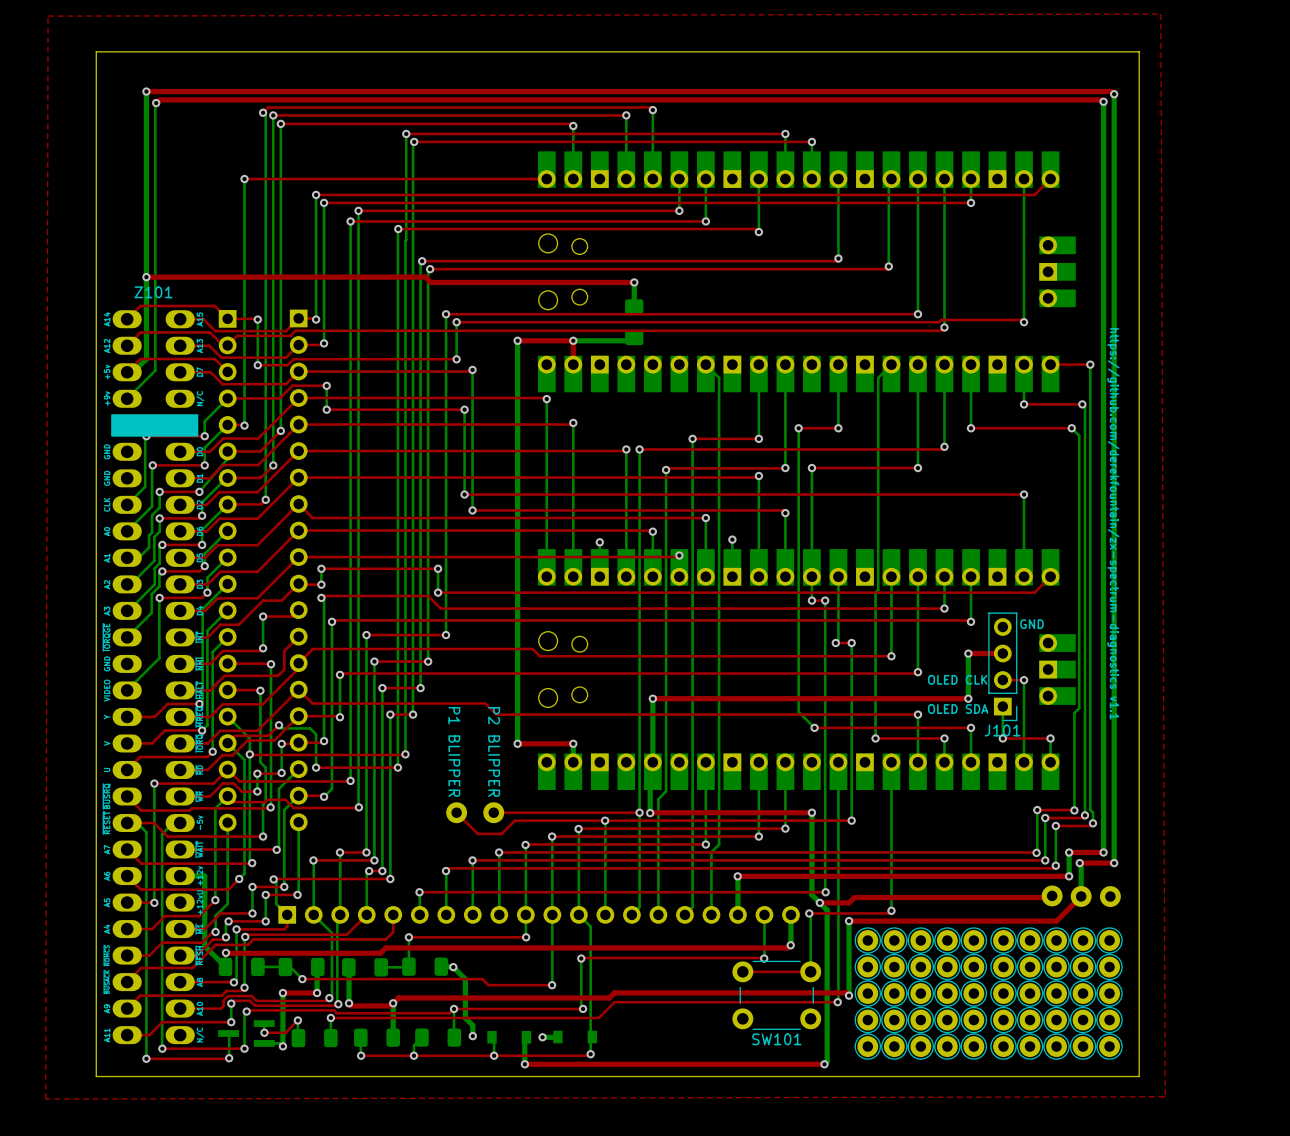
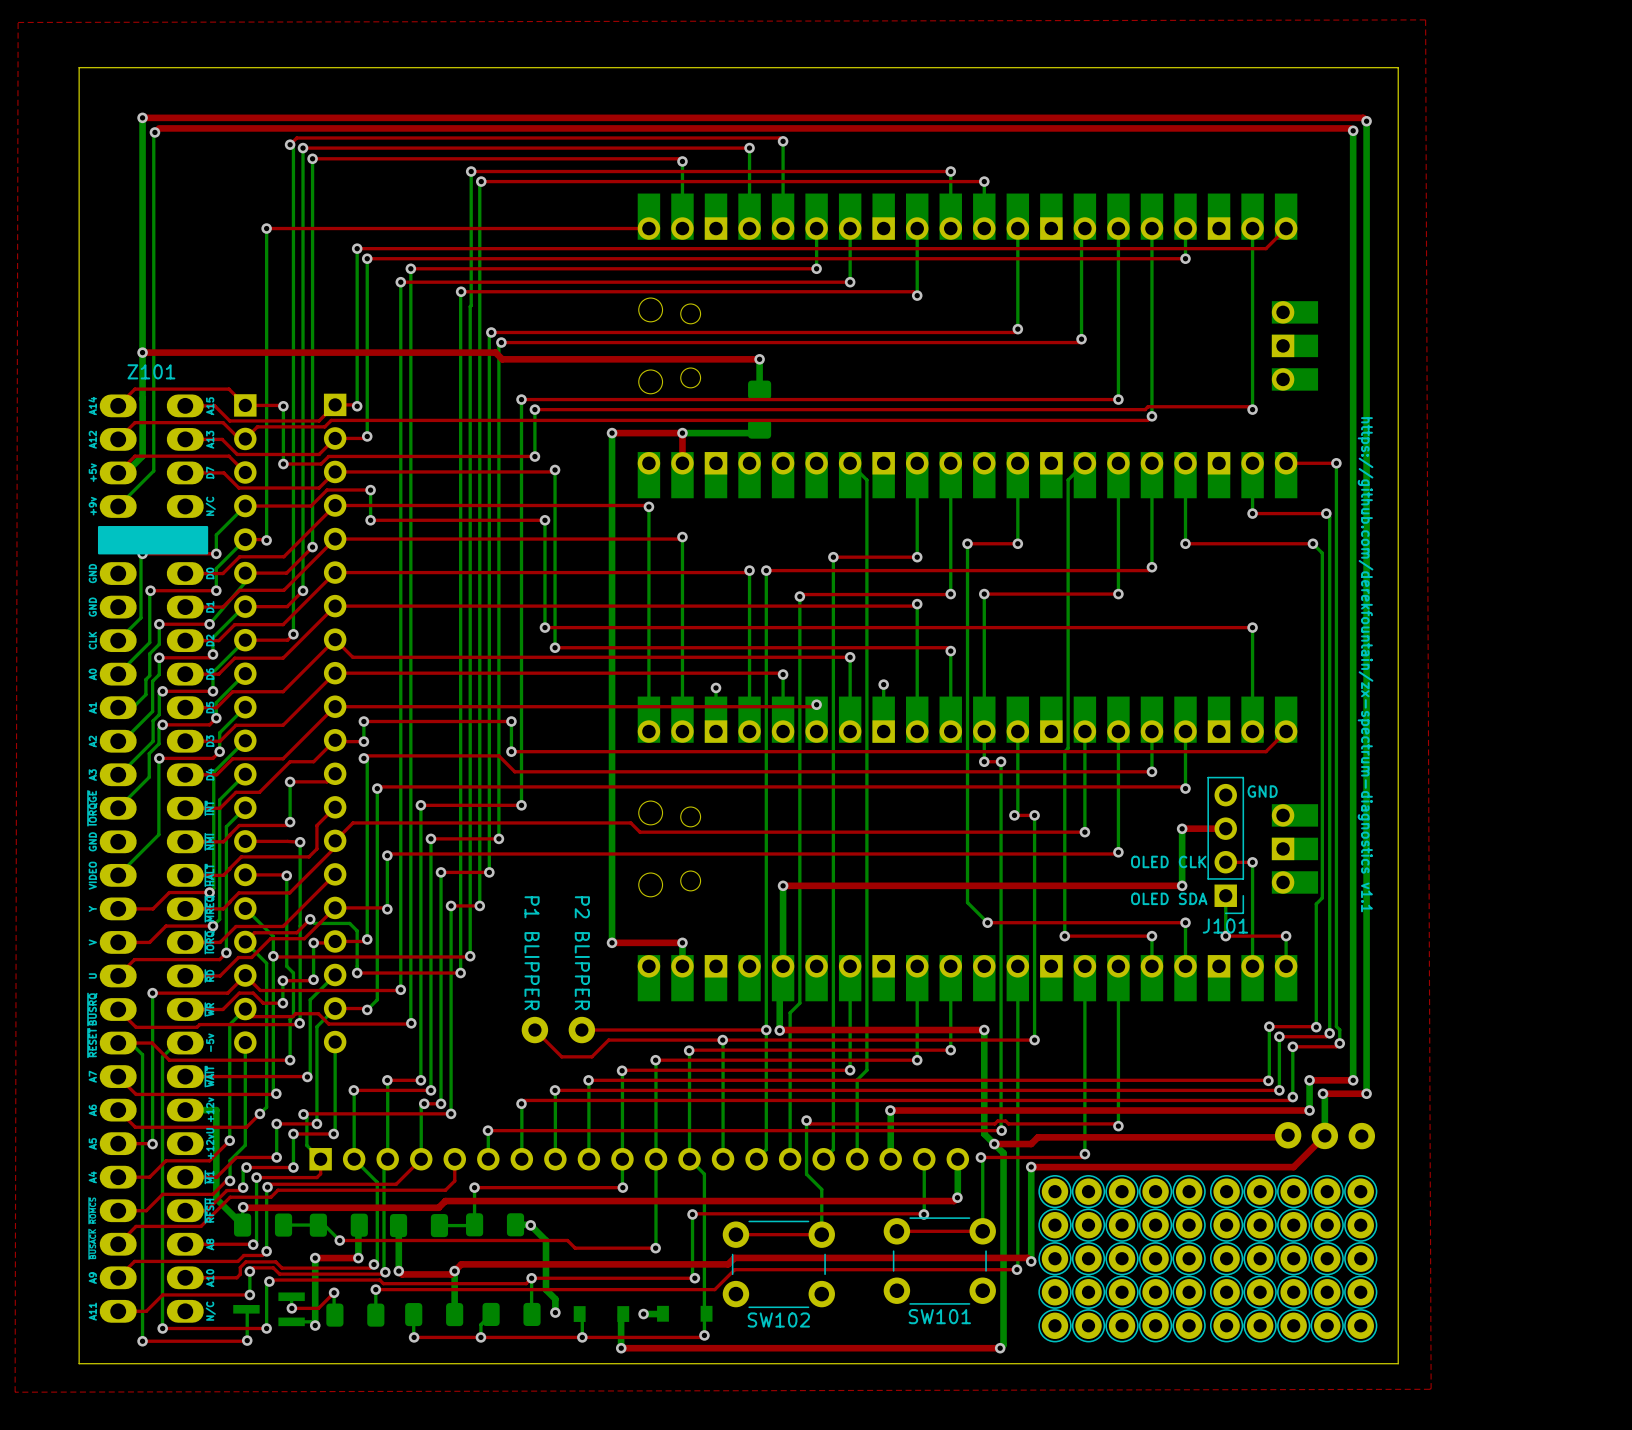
top track: (298, 689) (312, 703) (485, 703) (496, 714) (917, 714) -> none
bottom track: (917, 714) (917, 762) -> (1118, 1126) (1118, 966)
via: (917, 714) -> none
top track: none -> (806, 1120) (809, 1123) (994, 1123) (997, 1121) (1005, 1121) (1008, 1123) (1116, 1123) (1118, 1126)
bottom track: none -> (806, 1120) (806, 1174) (821, 1189) (821, 1234)
via: none -> (806, 1120)
via: none -> (1118, 1126)
top track: none -> (735, 1234) (821, 1234)
SW102: none -> (778, 1264)

